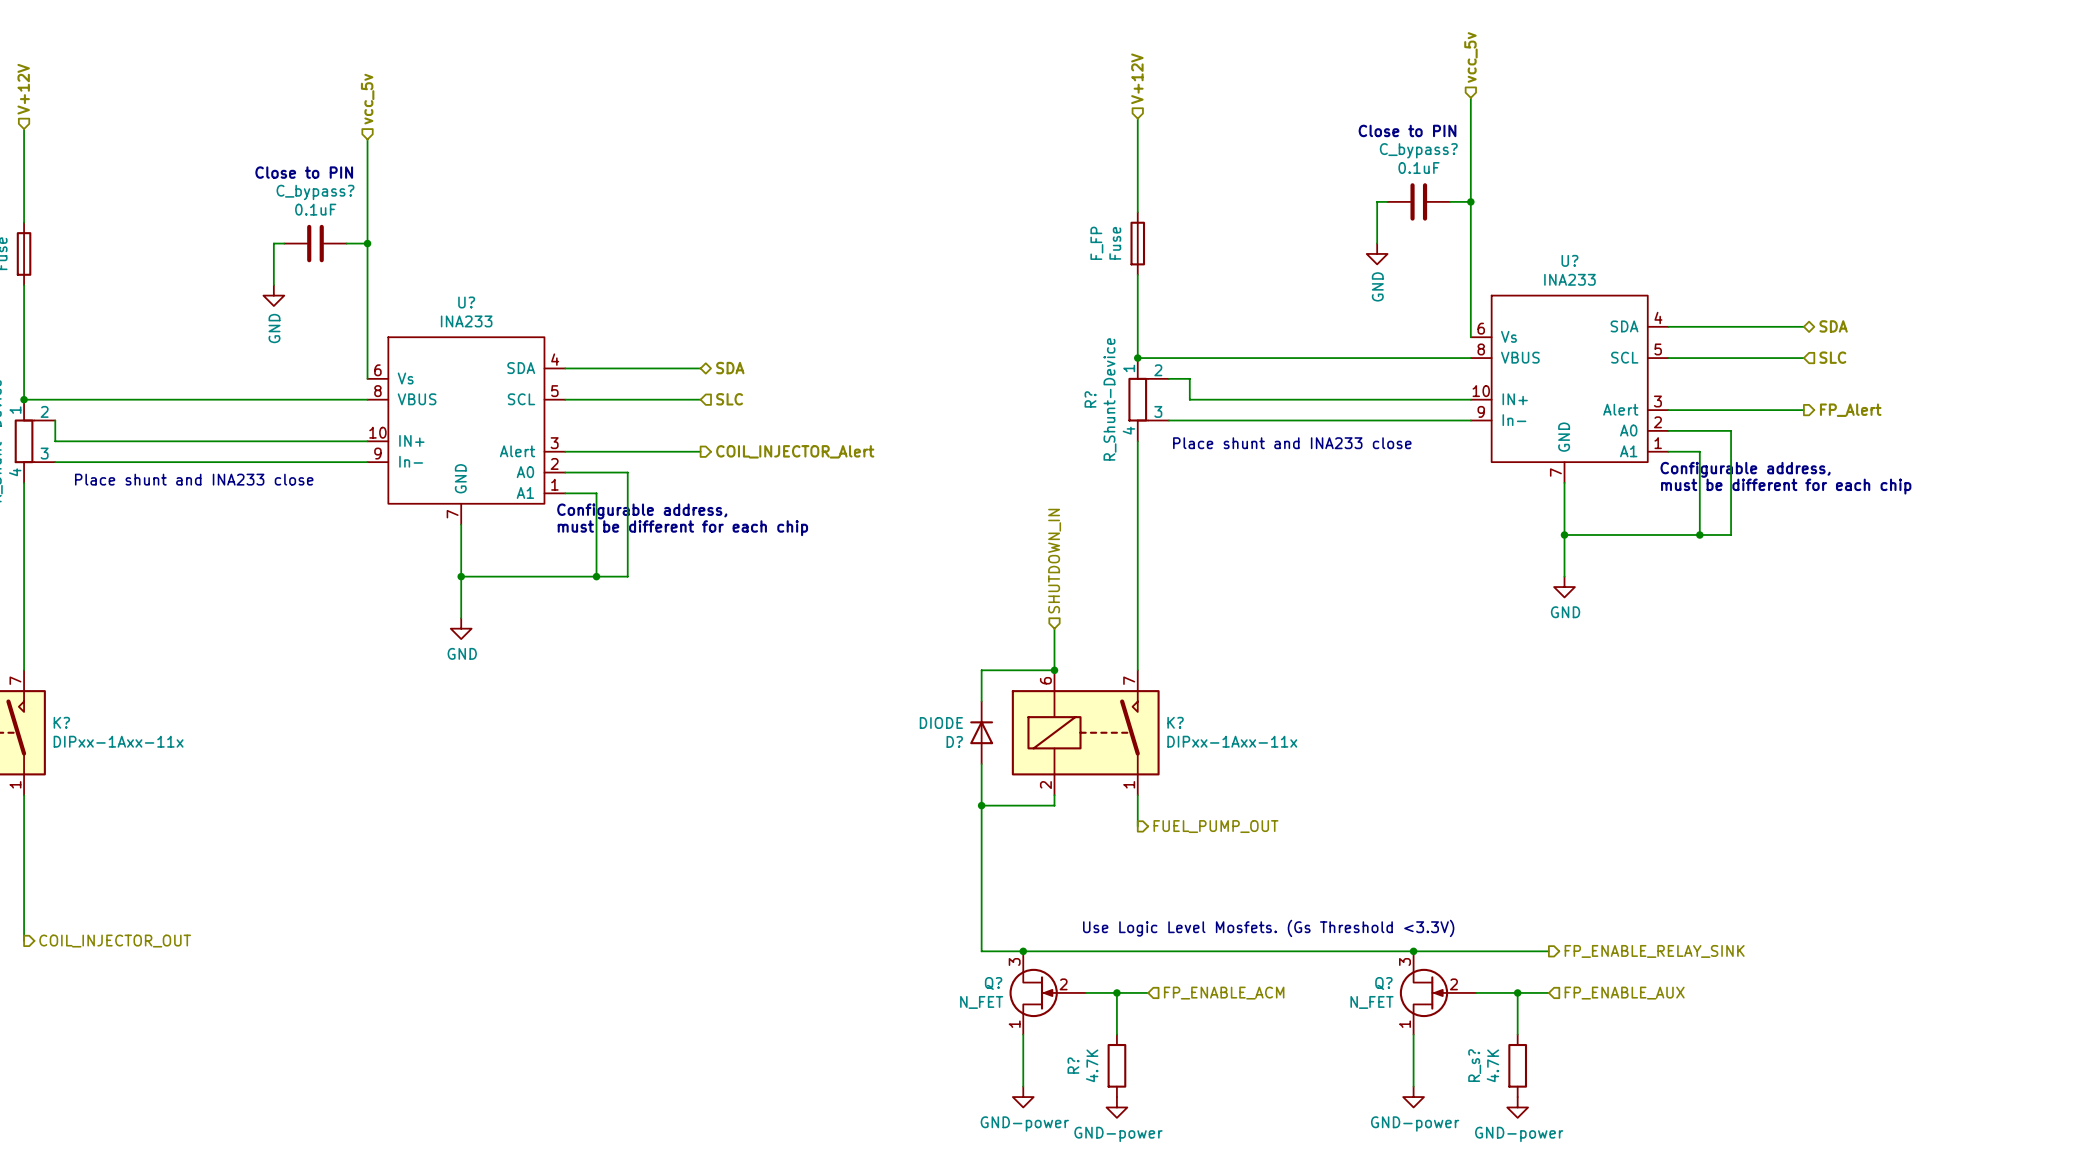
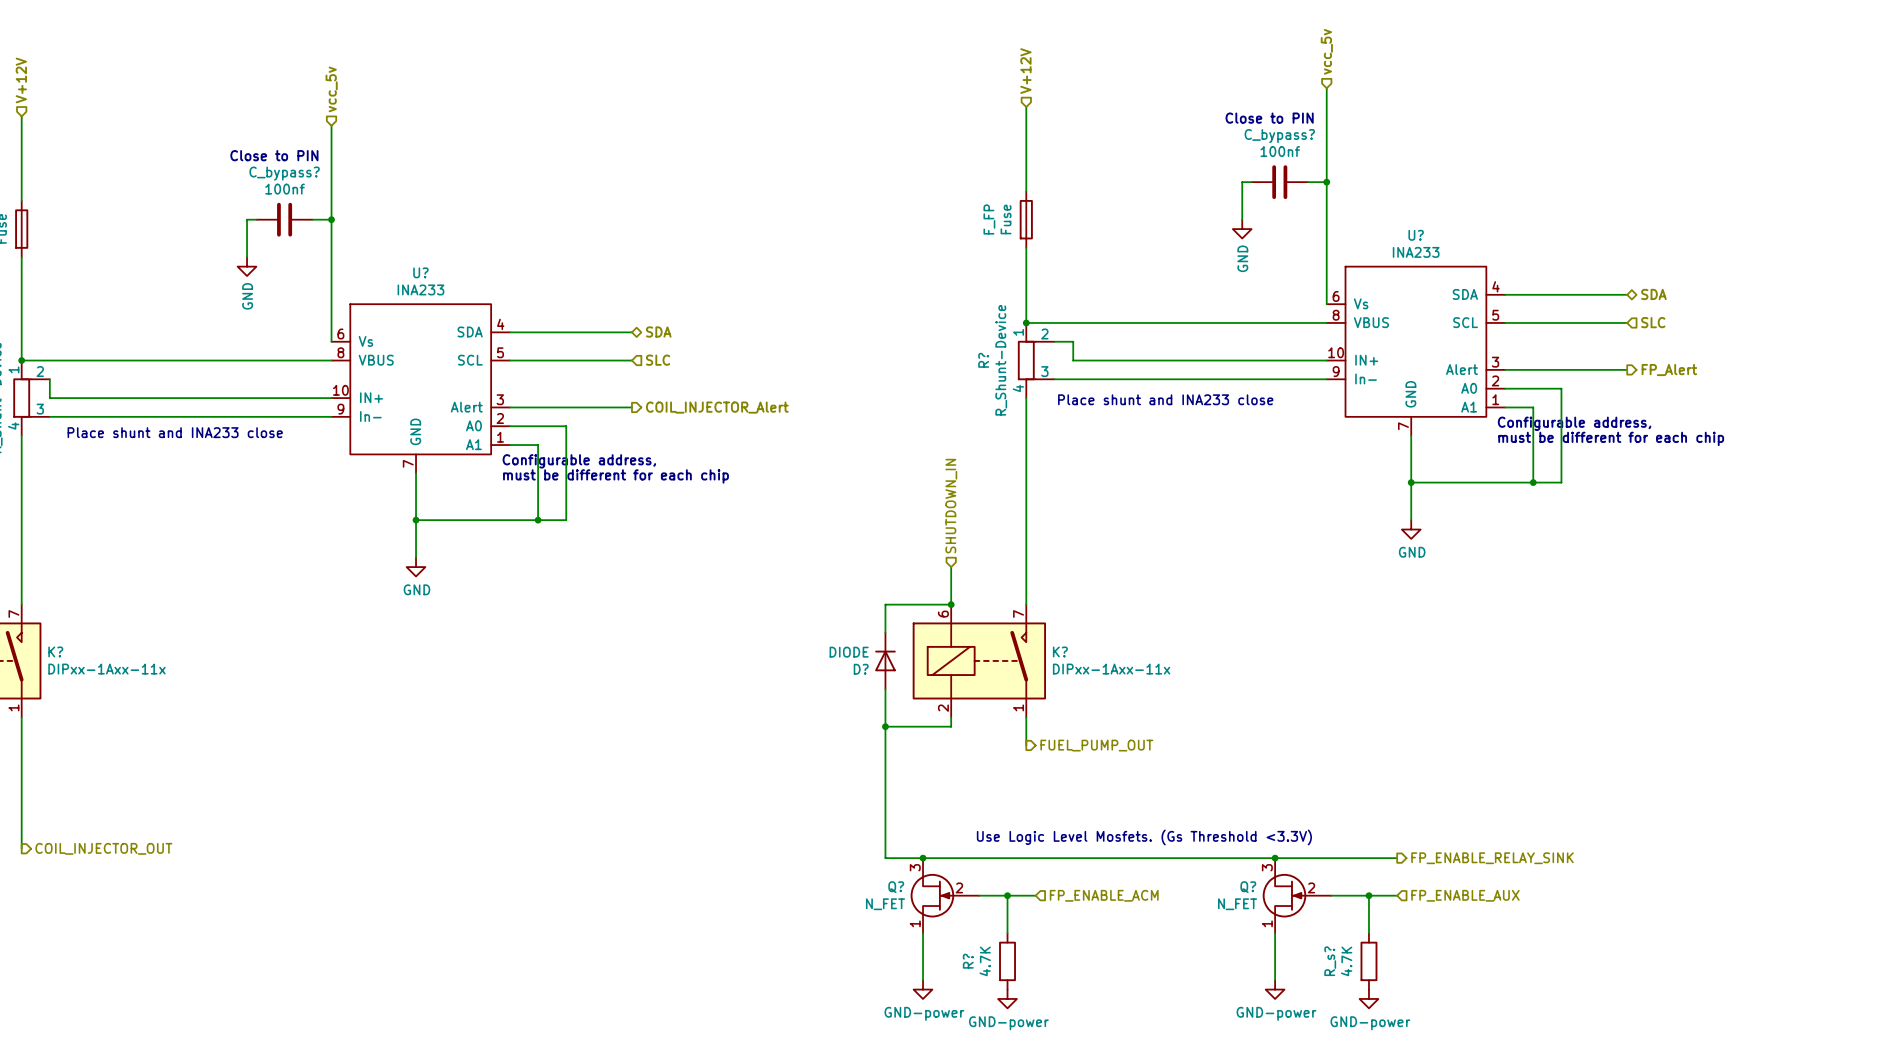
C_bypass? value: 0.1uF (1419, 168) -> 100nf (1280, 151)
C_bypass? value: 0.1uF (315, 209) -> 100nf (285, 189)

